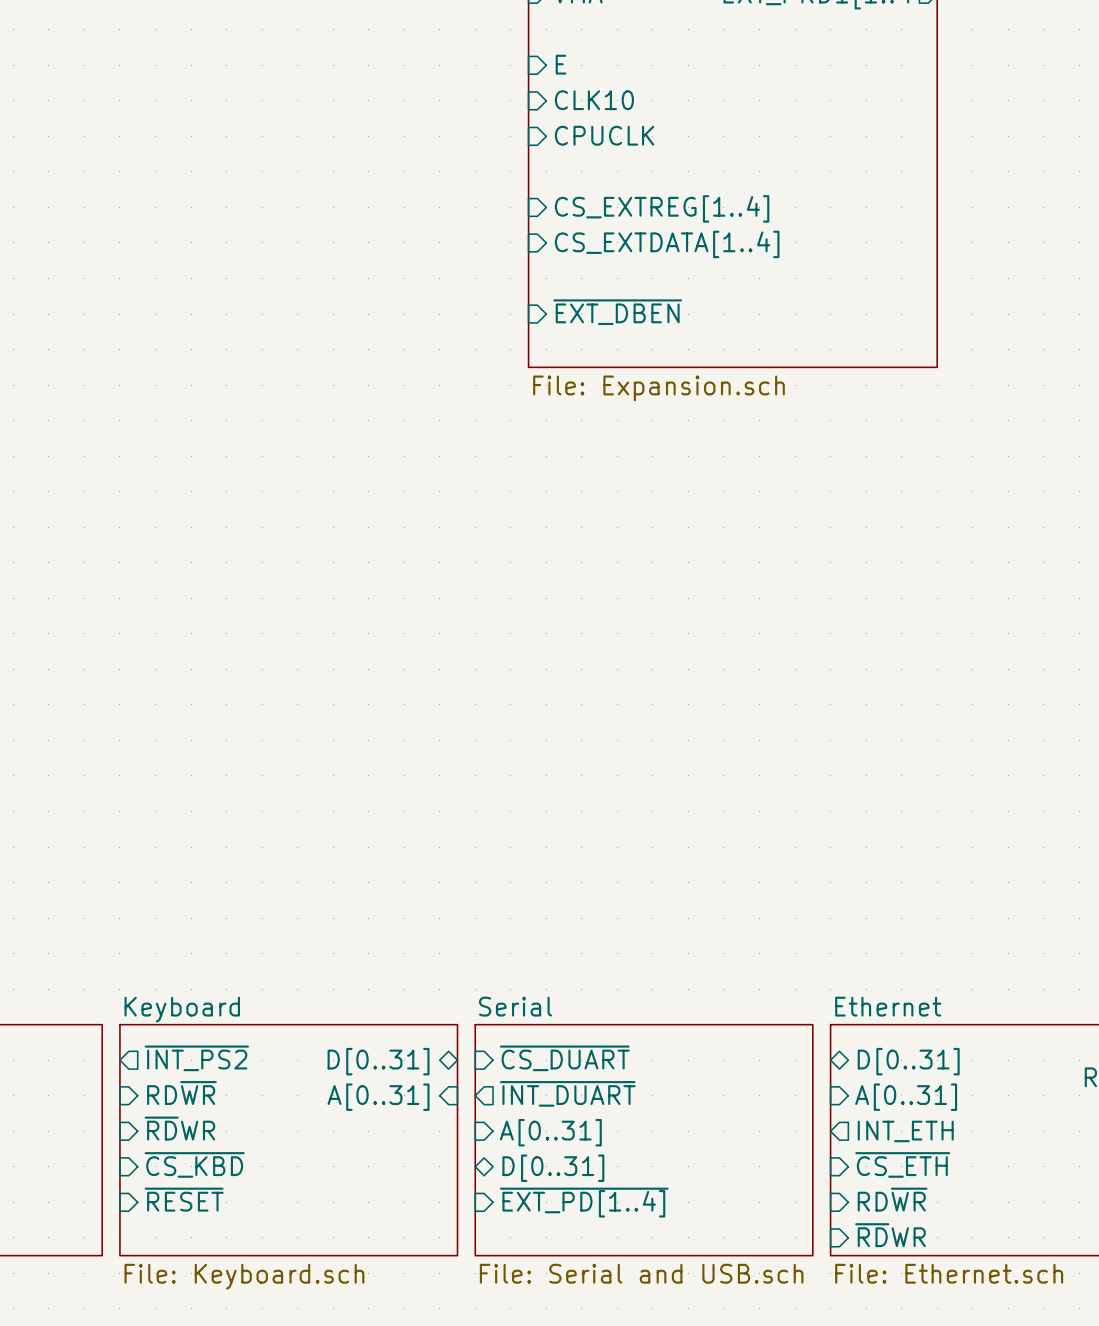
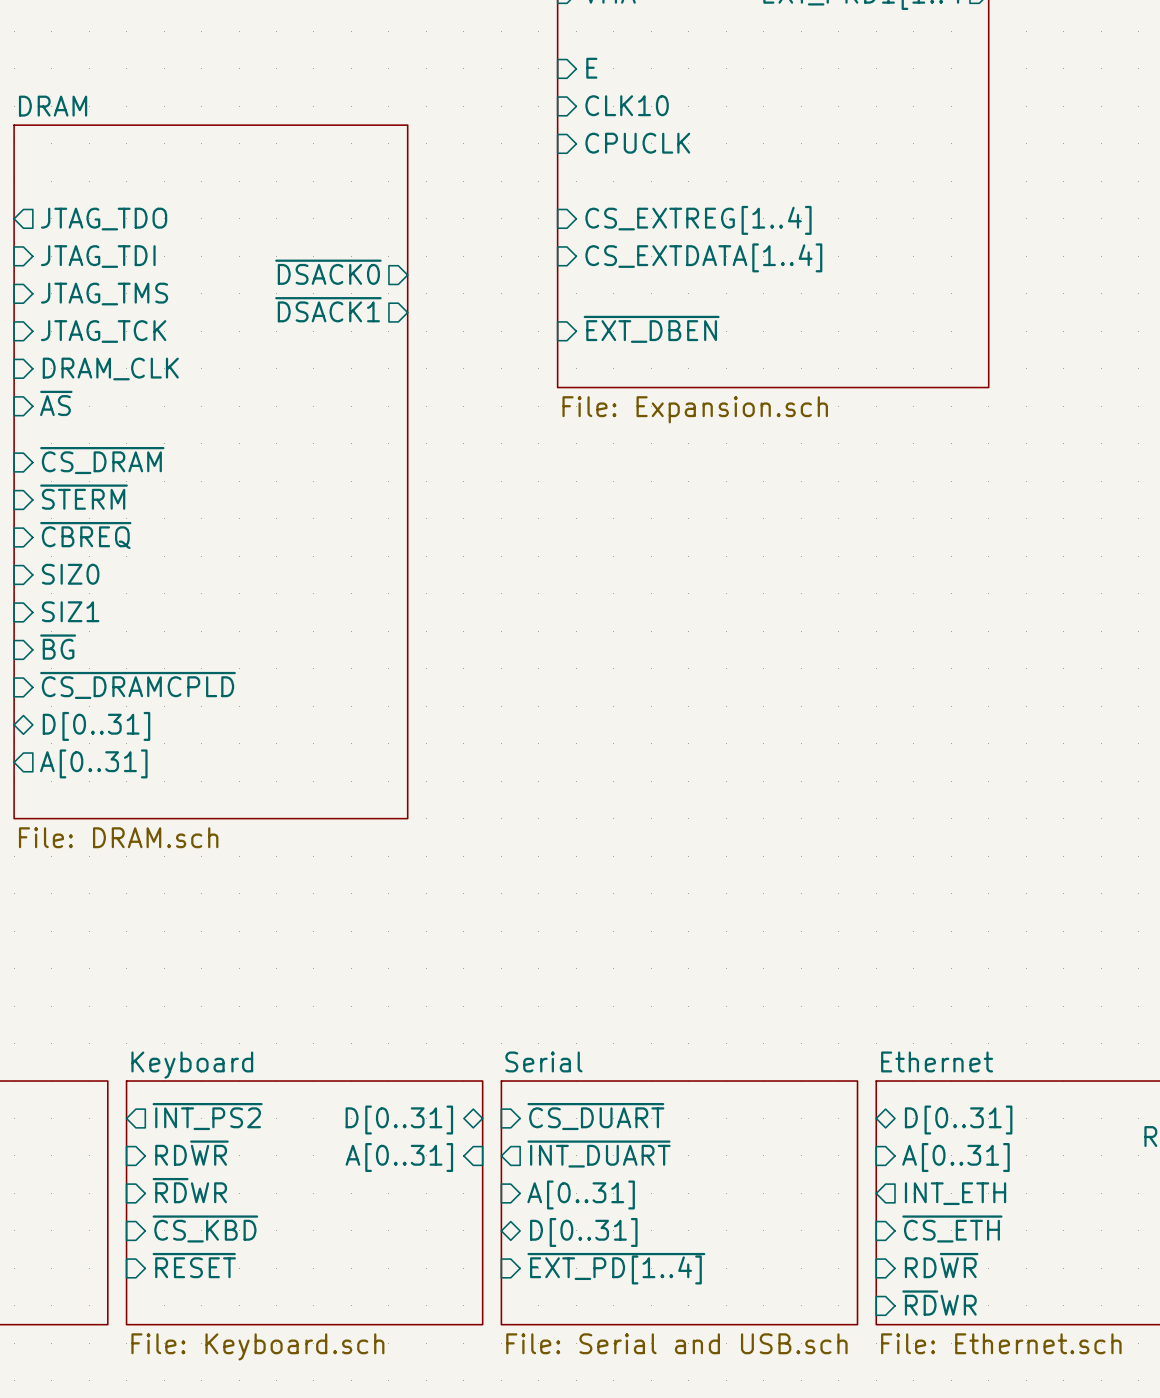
sheet pin: none -> JTAG_TDO (104, 219)
sheet pin: none -> JTAG_TDI (98, 256)
sheet pin: none -> ~{DSACK0} (328, 272)
sheet pin: none -> JTAG_TMS (104, 294)
sheet pin: none -> ~{DSACK1} (328, 309)
sheet pin: none -> JTAG_TCK (103, 331)
sheet pin: none -> DRAM_CLK (110, 368)
sheet pin: none -> ~{AS} (56, 403)
sheet pin: none -> ~{CS_DRAM} (102, 460)
sheet DRAM: none -> File: DRAM.sch (210, 471)
sheet pin: none -> ~{STERM} (84, 497)
sheet pin: none -> ~{CBREQ} (85, 535)
sheet pin: none -> SIZ0 (70, 574)
sheet pin: none -> SIZ1 (70, 611)
sheet pin: none -> ~{BG} (58, 647)
sheet pin: none -> ~{CS_DRAMCPLD} (138, 685)
sheet pin: none -> D[0..31] (96, 726)
sheet pin: none -> A[0..31] (93, 763)

